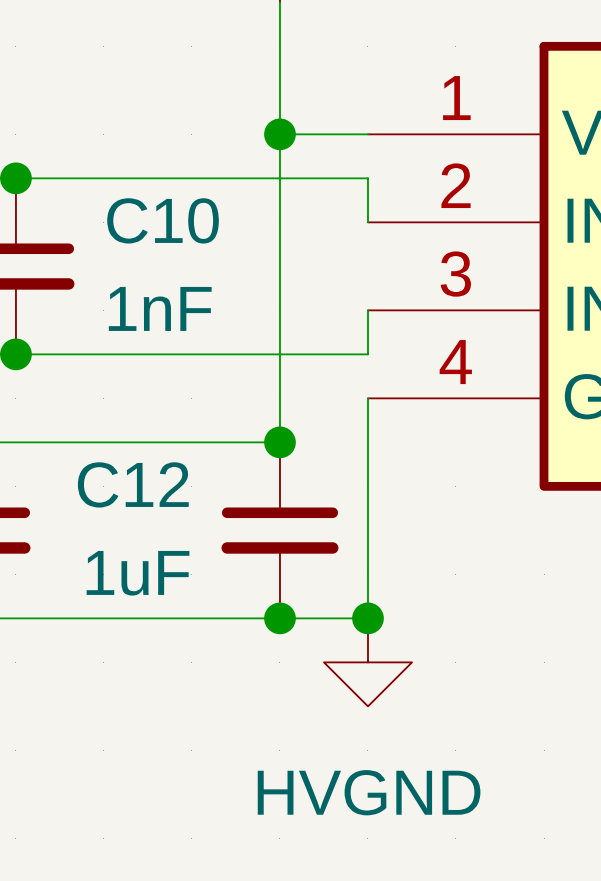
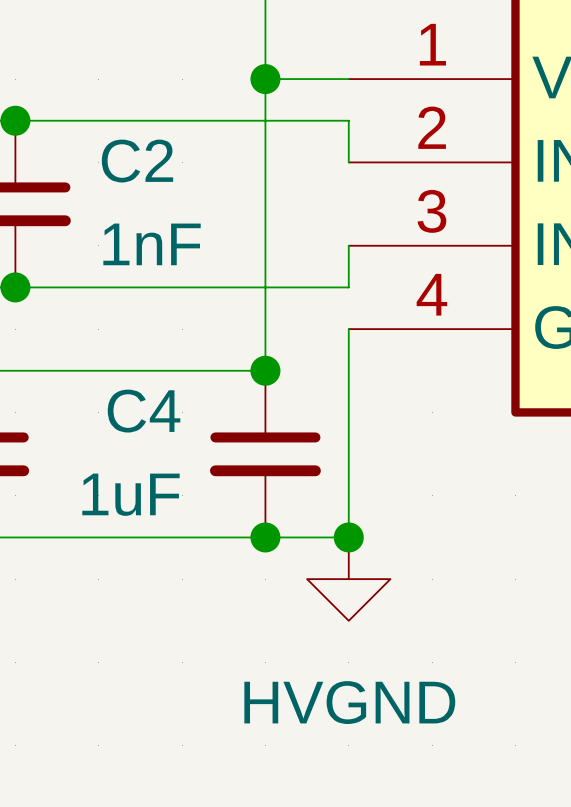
C10 name: C10 (163, 220) -> C2 (137, 161)
C12 name: C12 (133, 484) -> C4 (144, 411)

